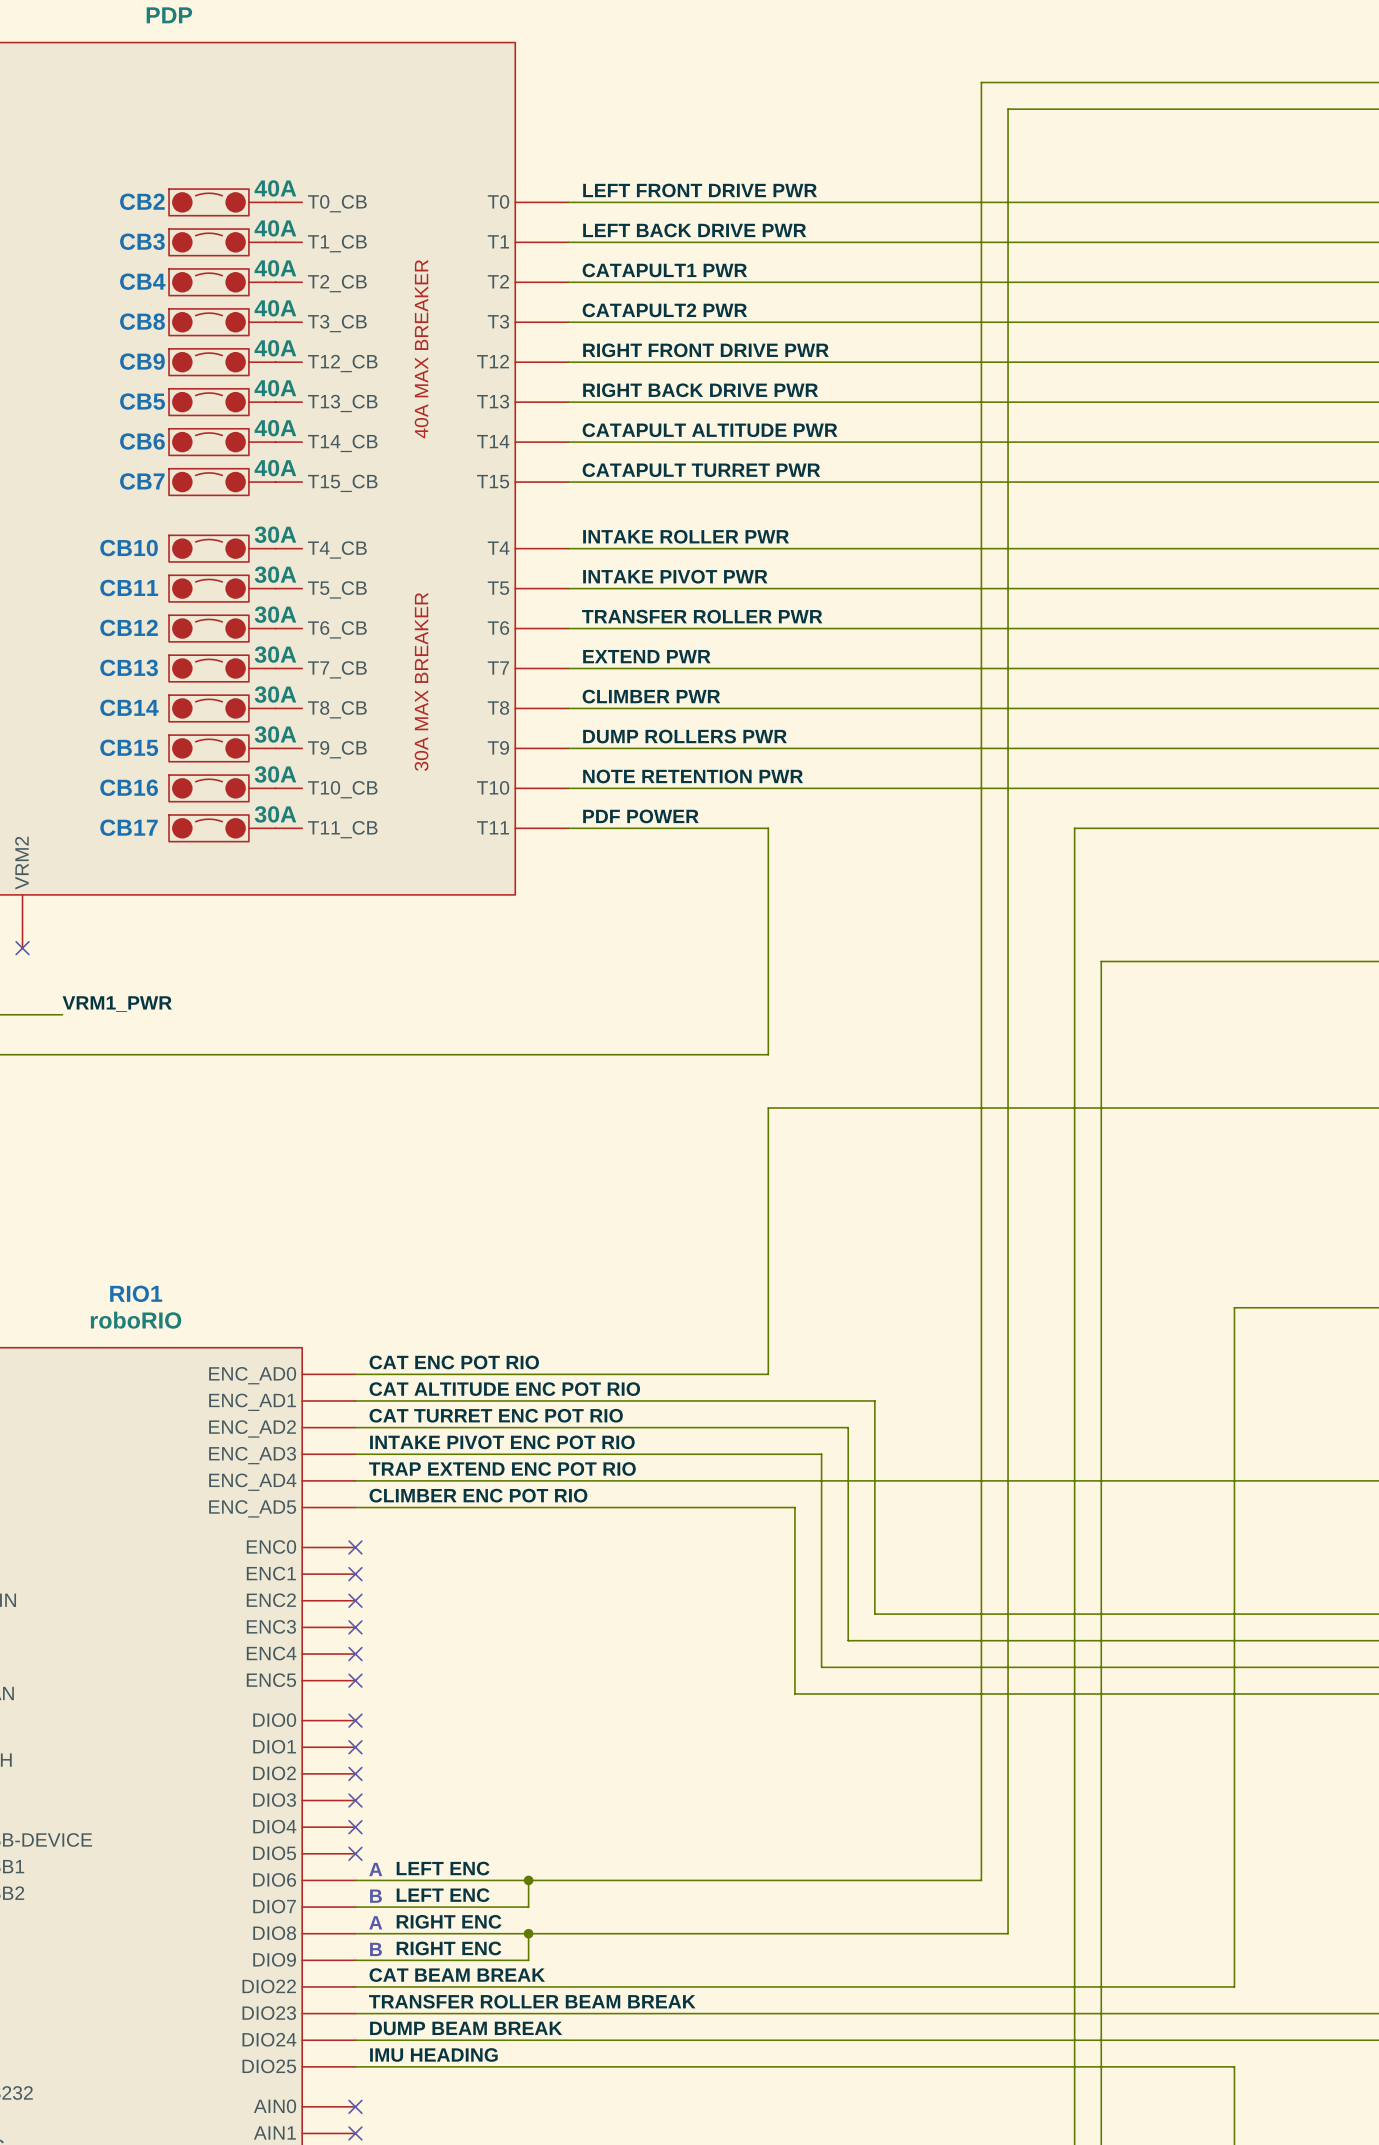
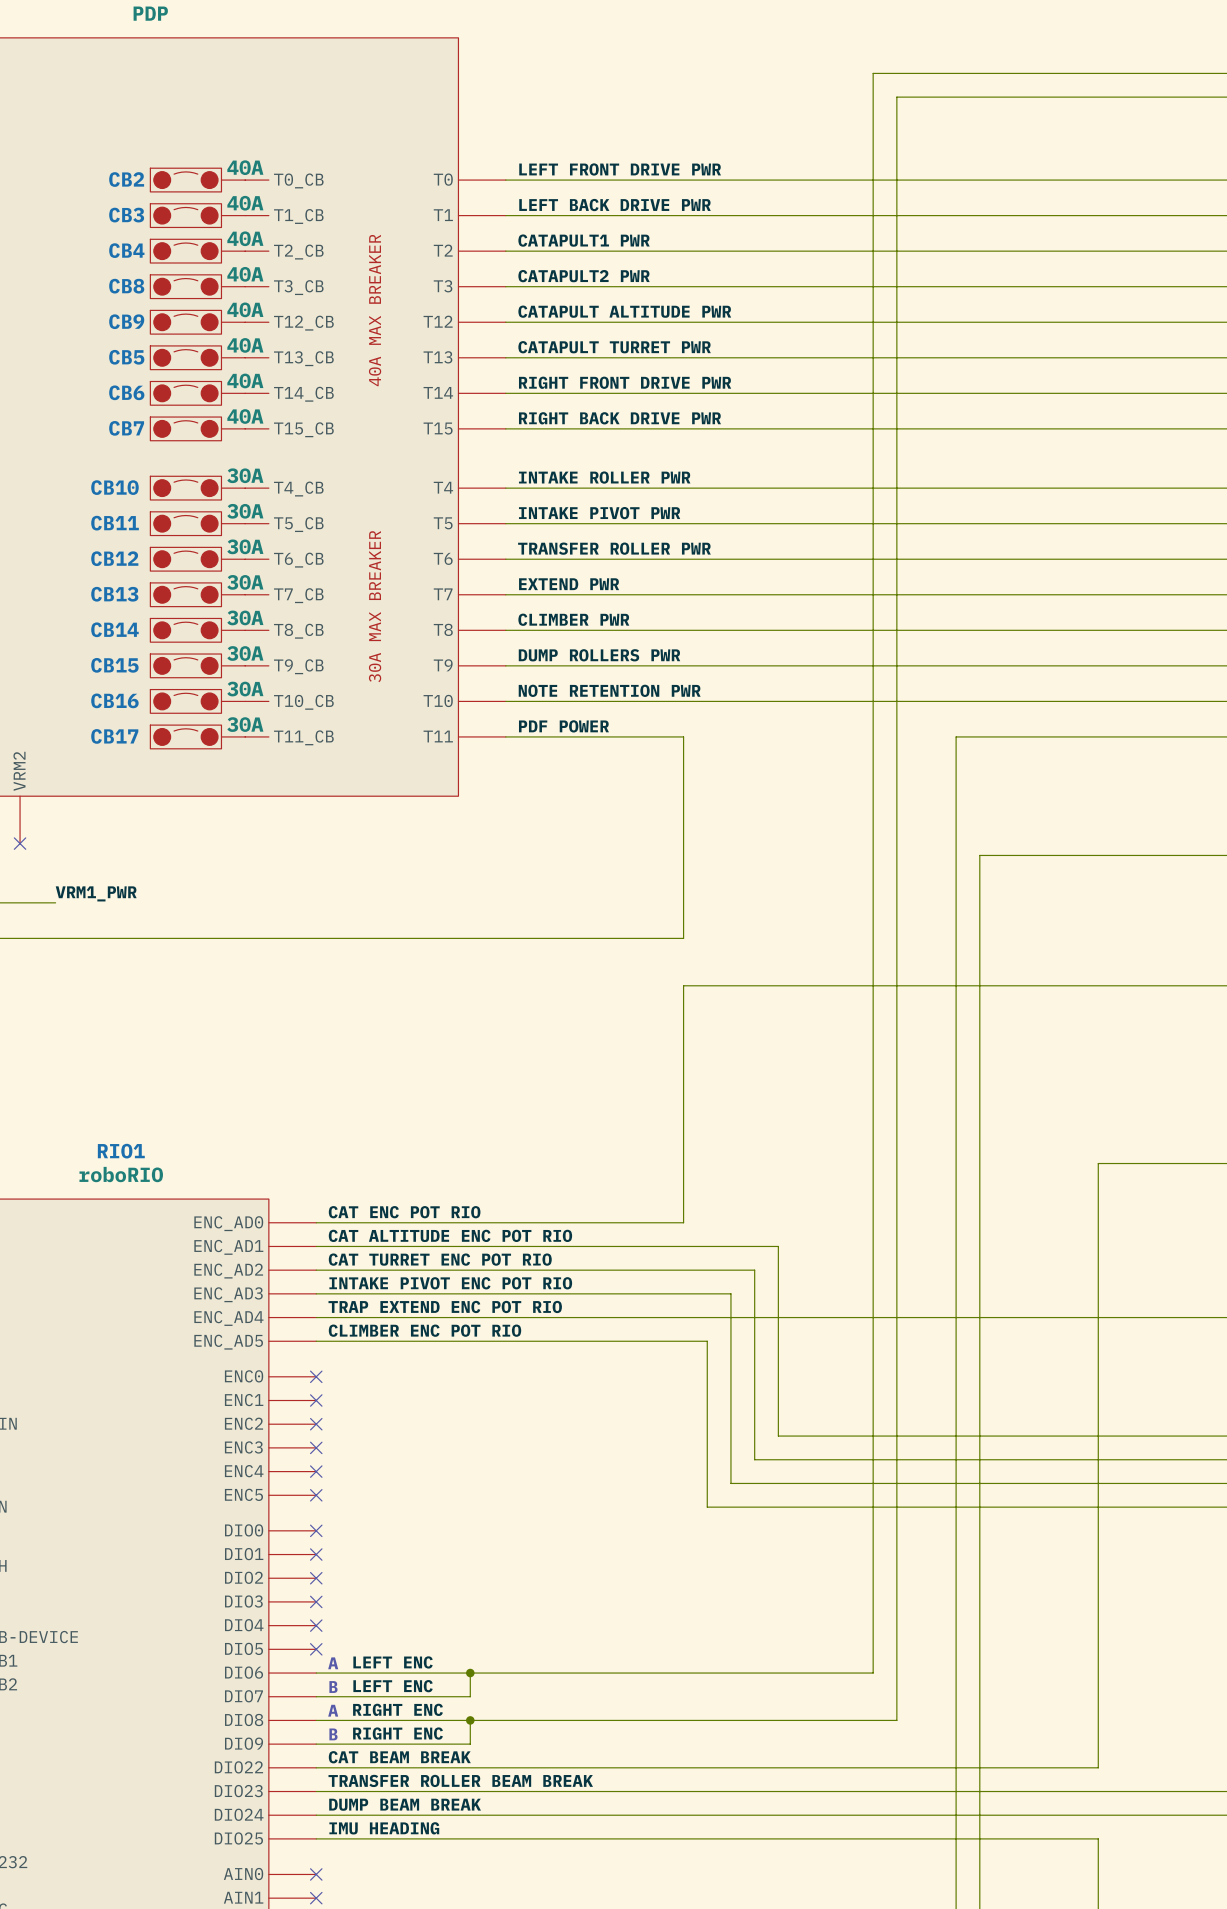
label: RIGHT FRONT DRIVE PWR (705, 350) -> CATAPULT ALTITUDE PWR (624, 311)
label: RIGHT BACK DRIVE PWR (700, 390) -> CATAPULT TURRET PWR (614, 347)
label: CATAPULT ALTITUDE PWR (710, 430) -> RIGHT FRONT DRIVE PWR (625, 382)
label: CATAPULT TURRET PWR (701, 470) -> RIGHT BACK DRIVE PWR (619, 418)

